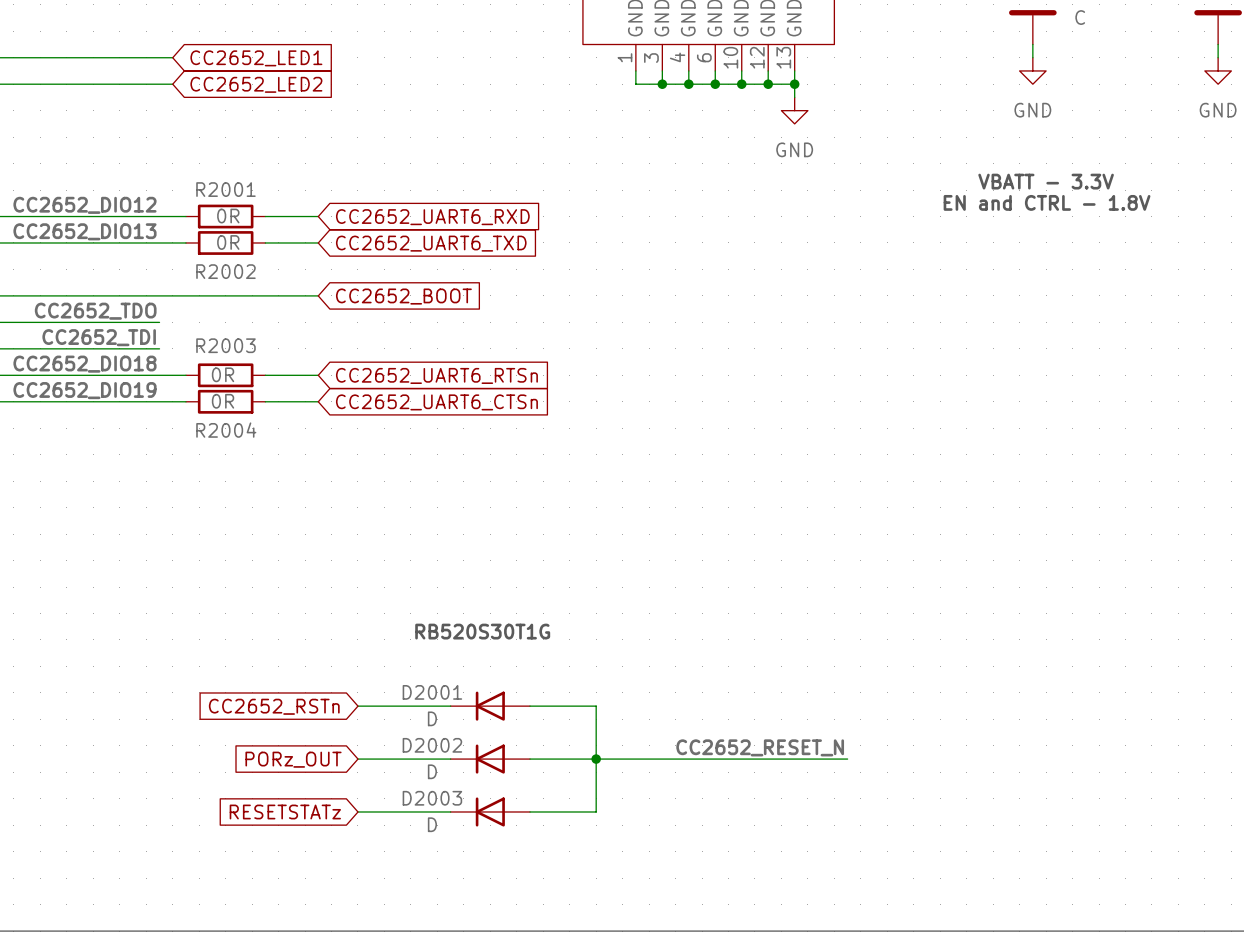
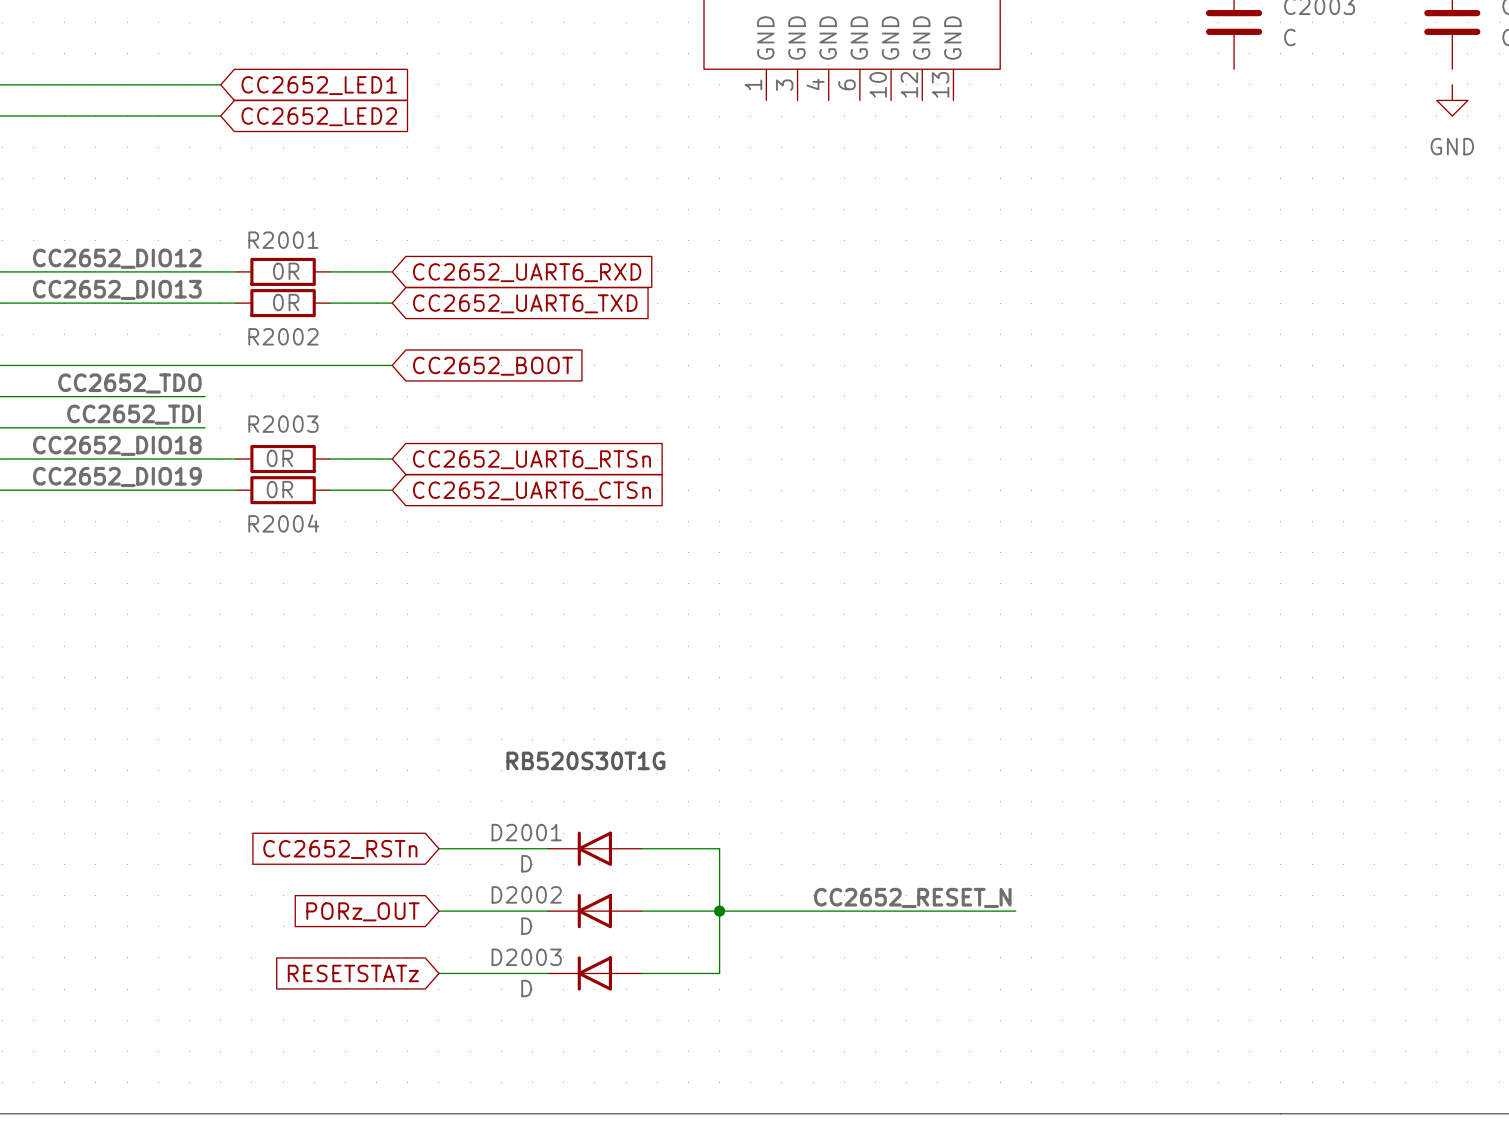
wire: (1032, 44) (1032, 57) -> none
wire: (1218, 44) (1218, 57) -> none
wire: (635, 70) (635, 84) (794, 84) -> none
wire: (662, 70) (662, 84) -> none
wire: (688, 70) (688, 84) -> none
wire: (715, 70) (715, 84) -> none
wire: (741, 70) (741, 84) -> none
wire: (768, 70) (768, 84) -> none
wire: (794, 70) (794, 97) -> none
power symbol: GND (1032, 70) -> none
junction: (662, 84) -> none
junction: (688, 84) -> none
junction: (715, 84) -> none
junction: (741, 84) -> none
junction: (768, 84) -> none
junction: (794, 84) -> none
power symbol: GND (794, 110) -> none
text: VBATT - 3.3V (1046, 181) -> none
text: EN and CTRL - 1.8V (1047, 202) -> none

